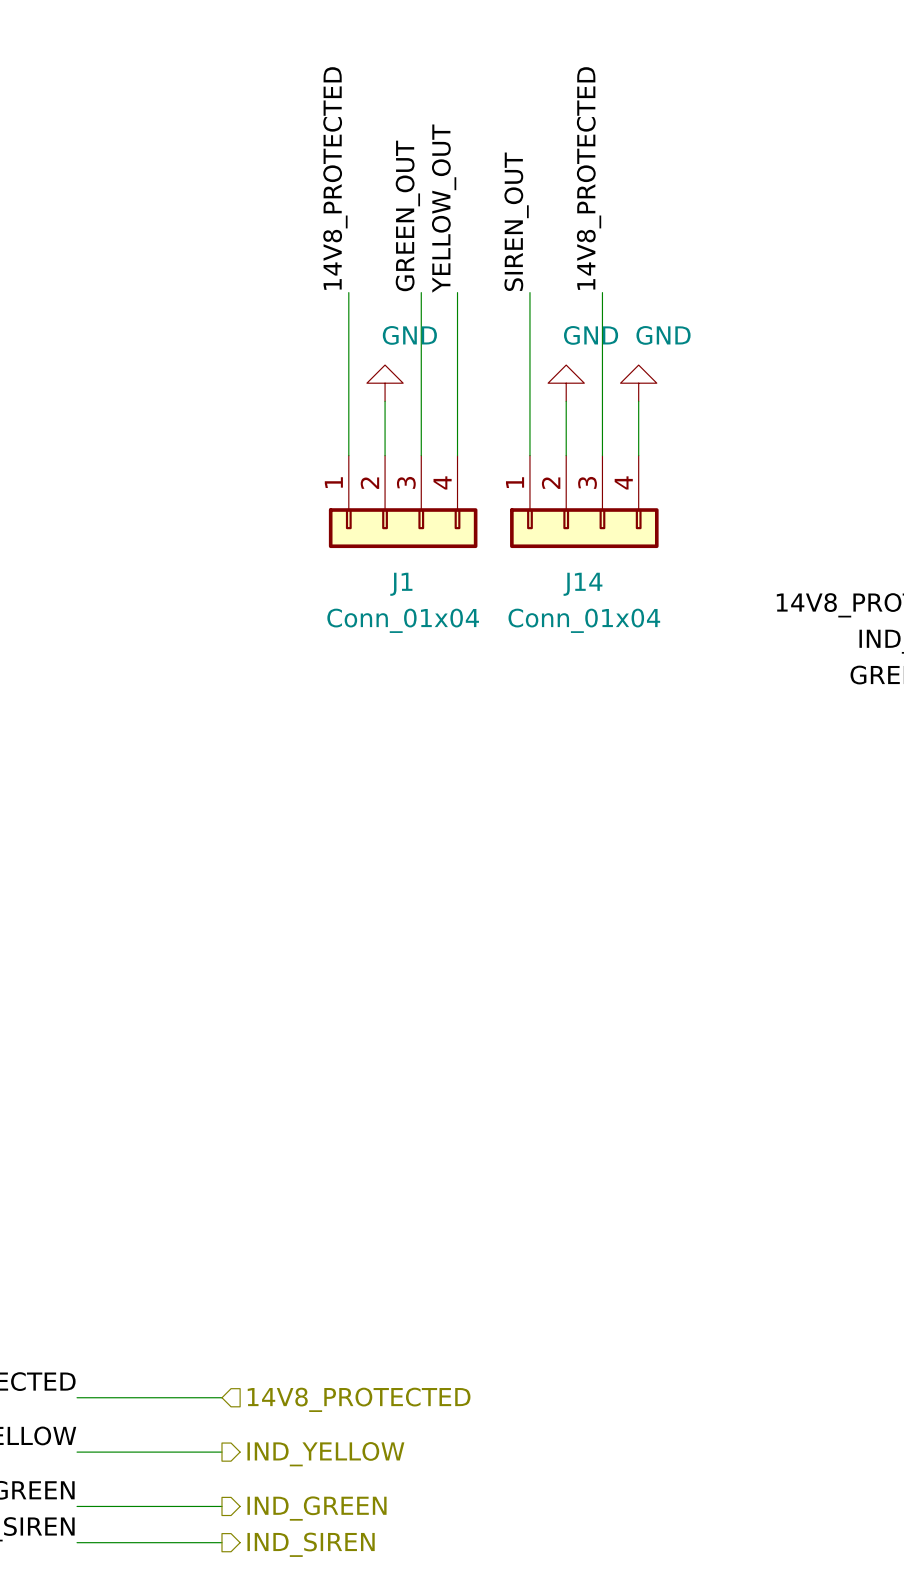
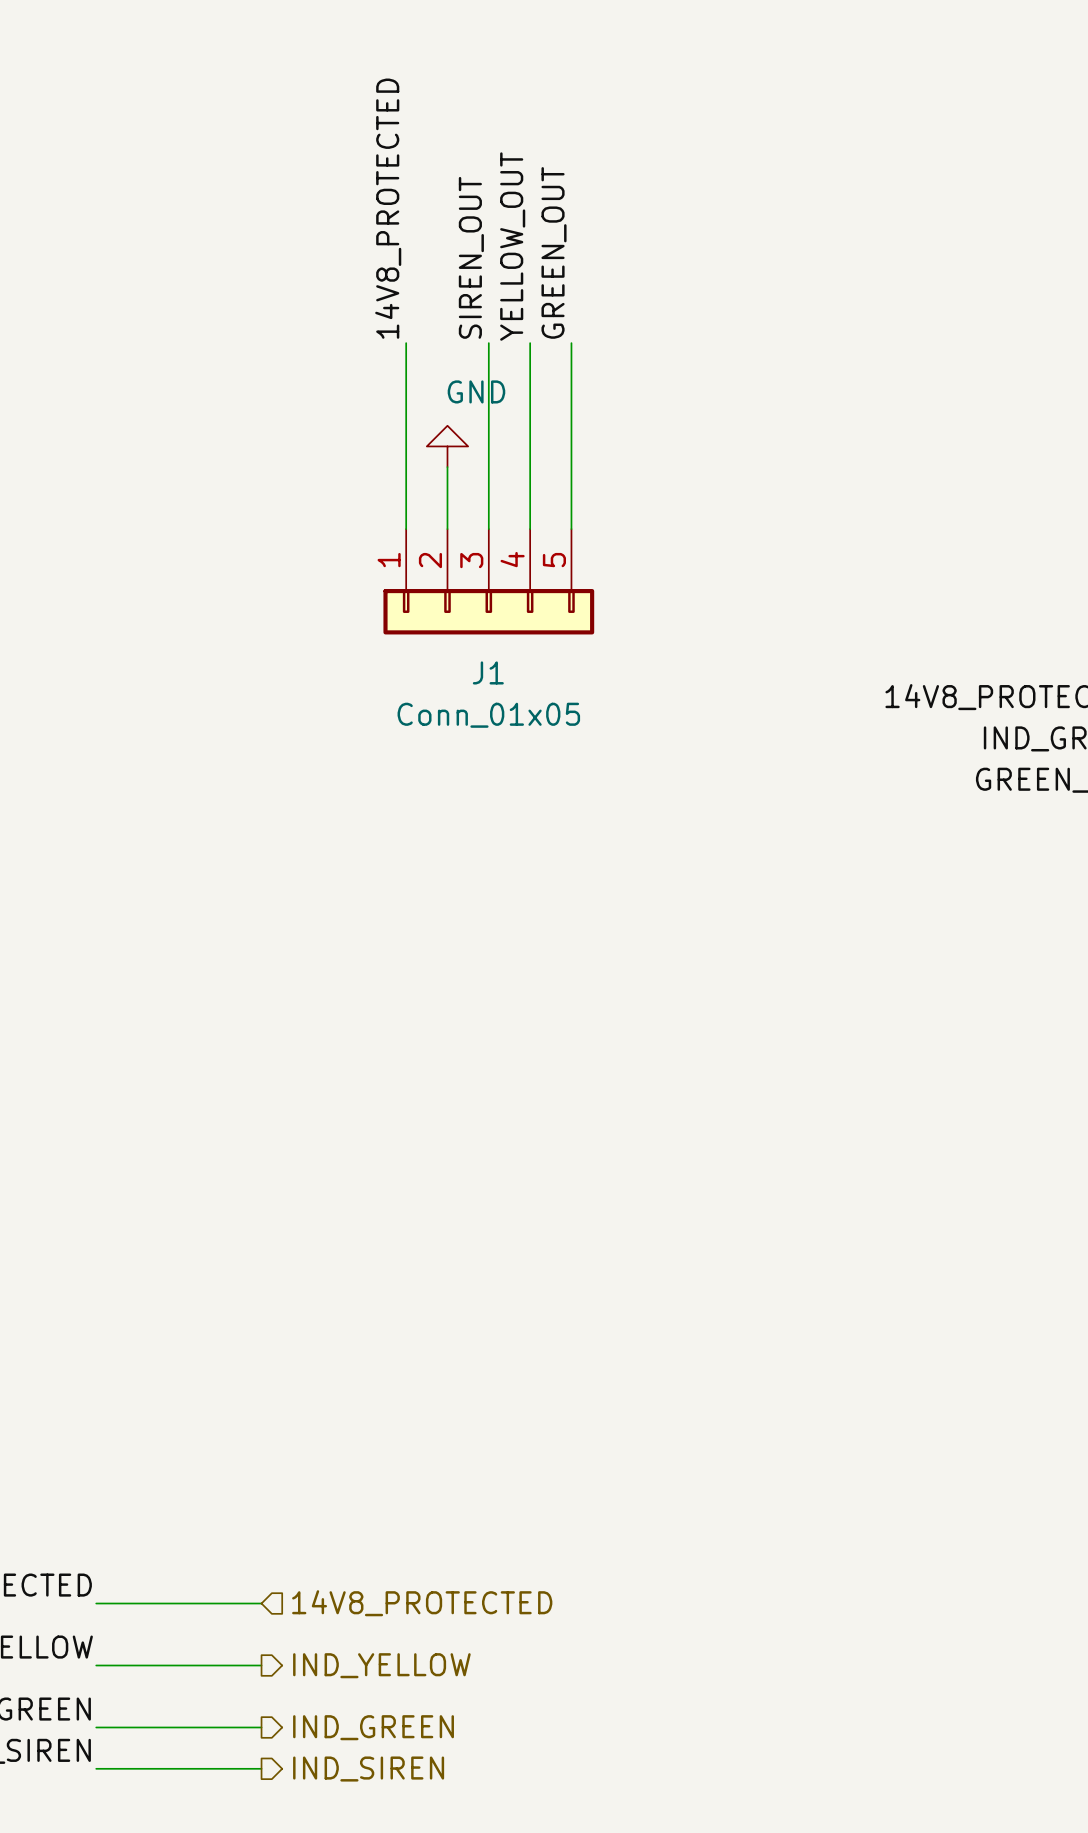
label: 14V8_PROTECTED (589, 178) -> none
label: GREEN_OUT (407, 215) -> SIREN_OUT (471, 257)
label: SIREN_OUT (516, 221) -> GREEN_OUT (554, 252)
wire: (529, 292) (529, 455) -> (571, 343) (571, 529)
wire: (602, 292) (602, 455) -> none
power symbol: GND (566, 383) -> none
power symbol: GND (638, 383) -> none
wire: (566, 401) (566, 455) -> none
wire: (638, 401) (638, 455) -> none
J1 symbol: [328, 455, 478, 549] -> [383, 529, 595, 635]
J14: Conn_01x04 (584, 501) -> none
J1 value: Conn_01x04 (403, 620) -> Conn_01x05 (488, 715)

